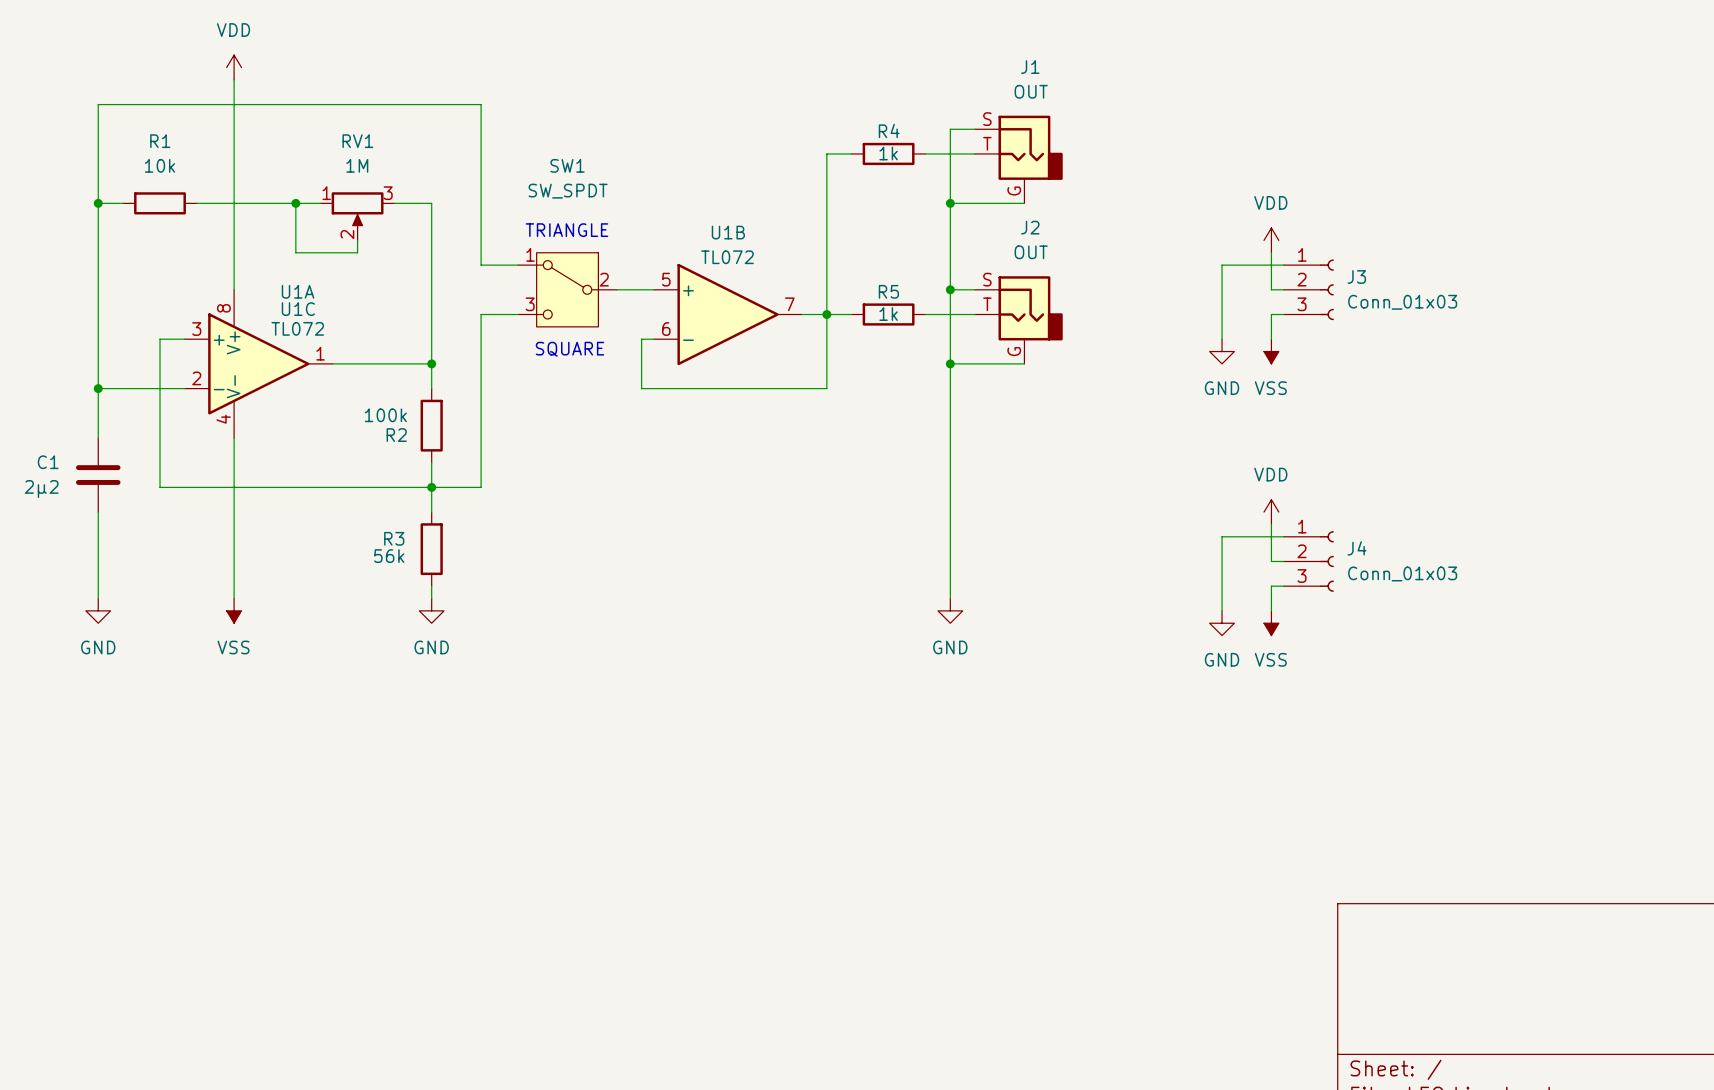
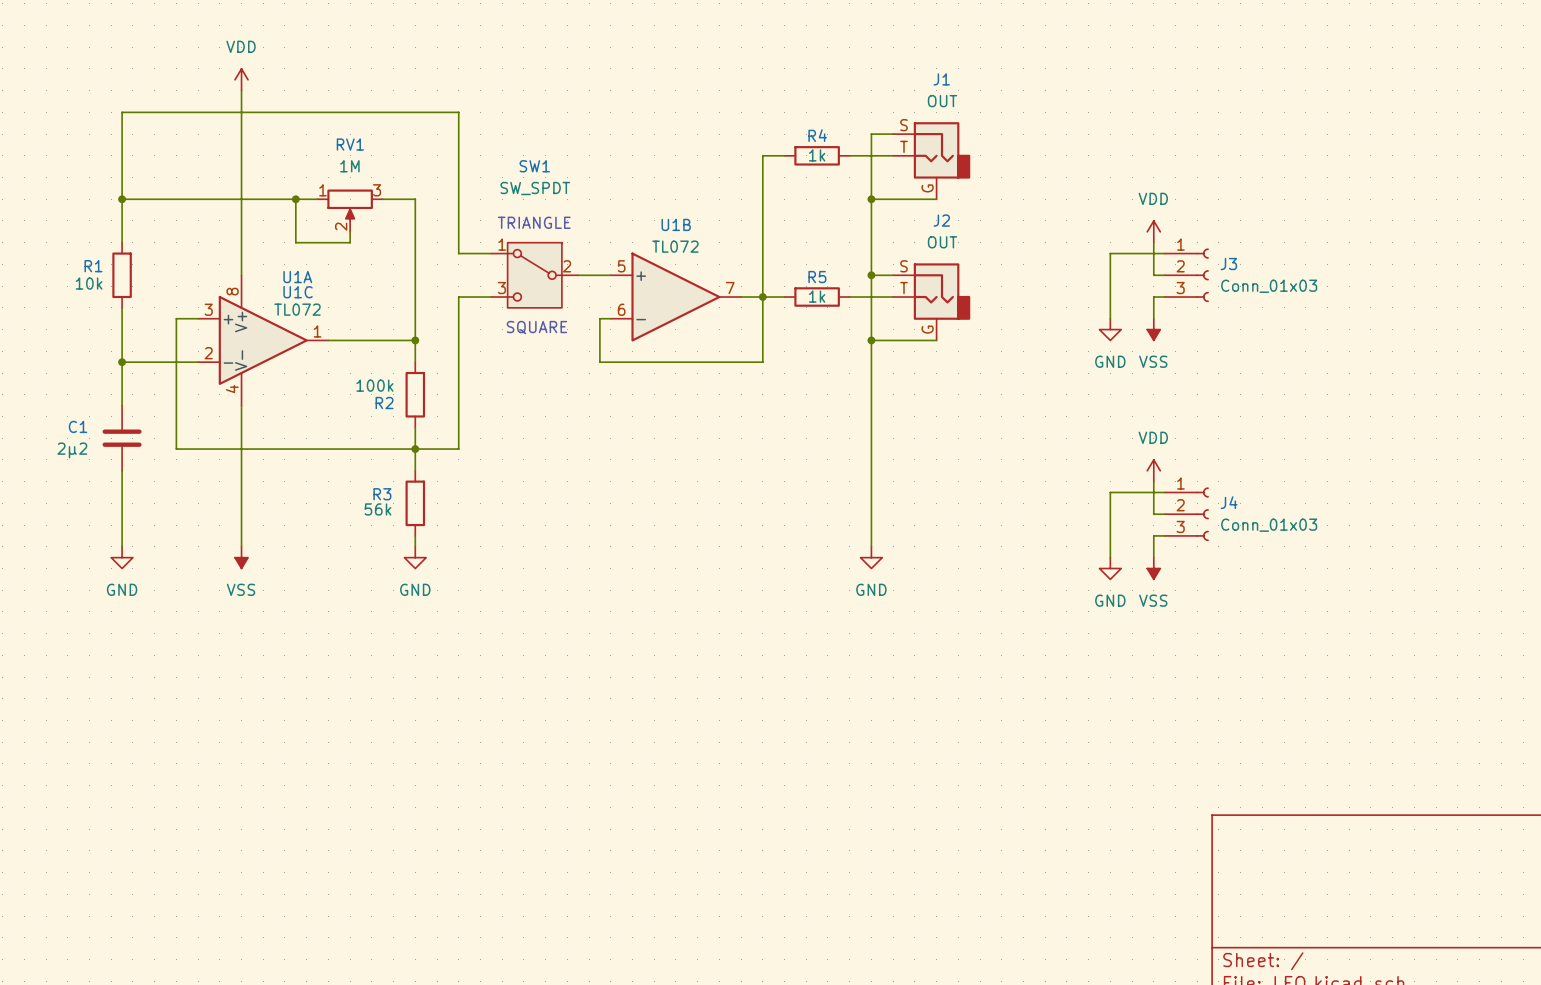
R1 name position: R1 (160, 141) -> R1 (93, 266)
R1 value position: 10k (160, 165) -> 10k (89, 283)
wire: none -> (143, 199) (208, 199)
R1 rotation: 0° (160, 203) -> 90° clockwise (122, 275)
R1 position: (160, 203) -> (122, 275)
wire: (98, 252) (98, 326) -> none

